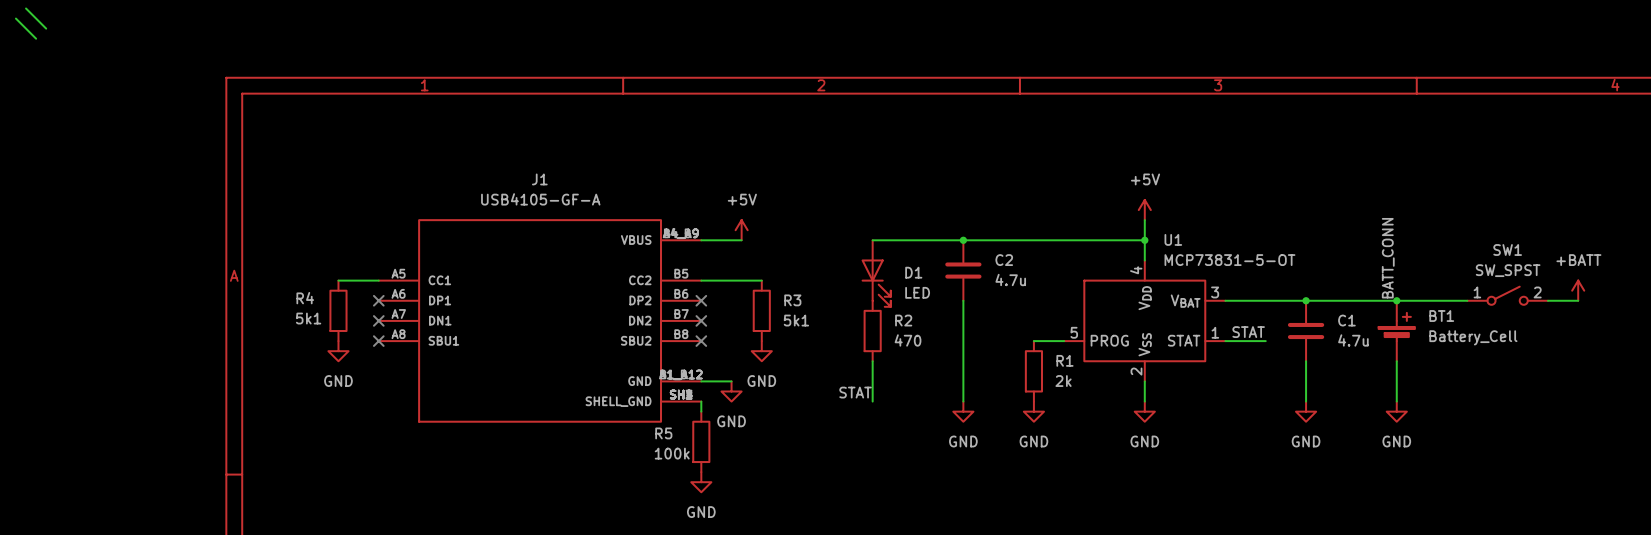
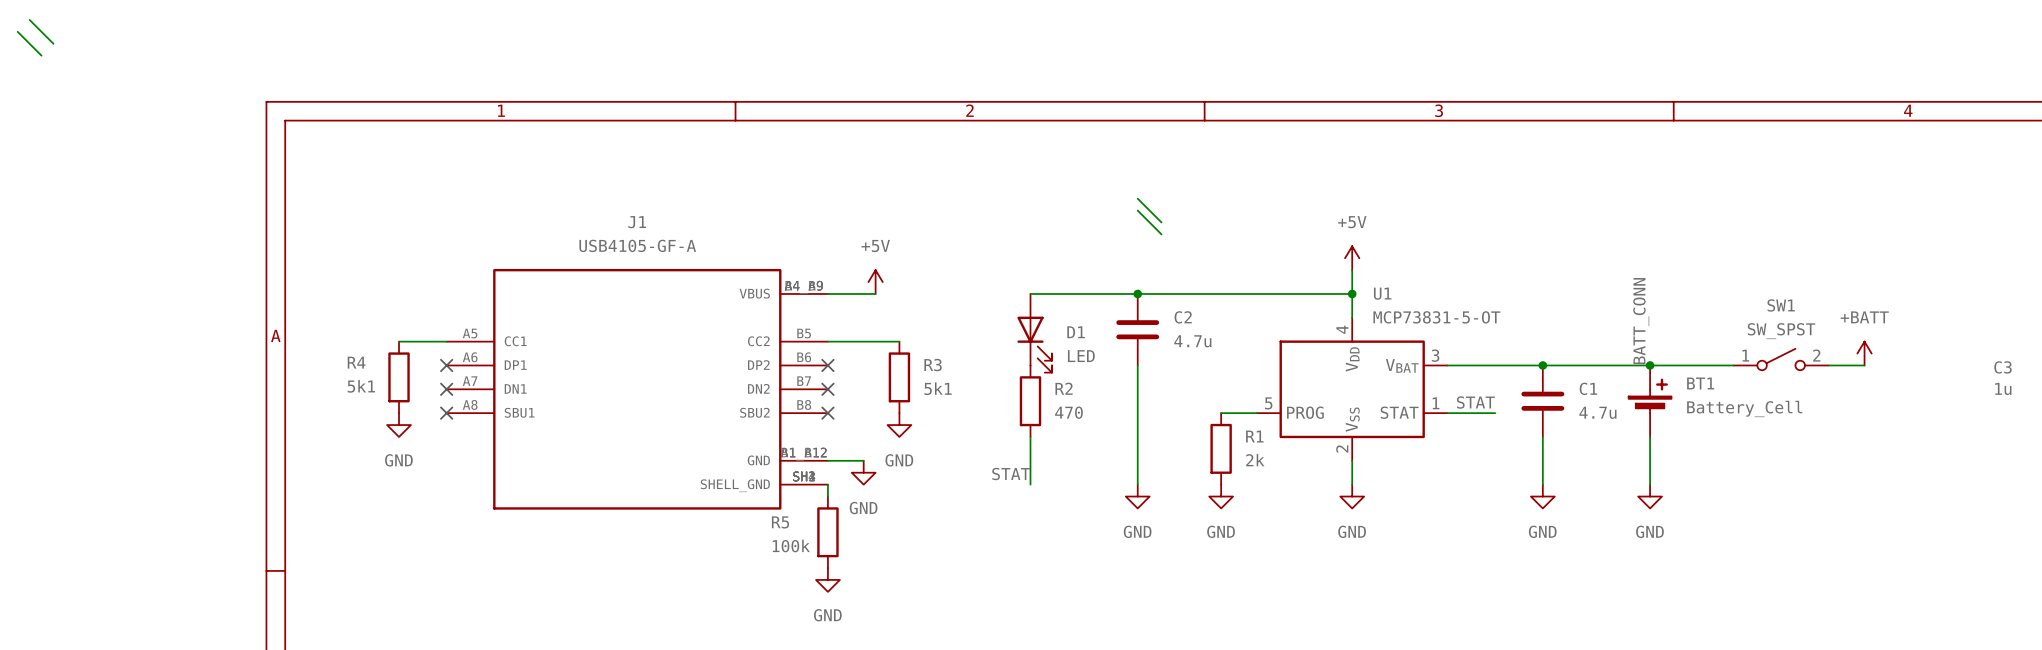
wire: none -> (1137, 198) (1161, 222)
wire: none -> (1137, 210) (1161, 234)

